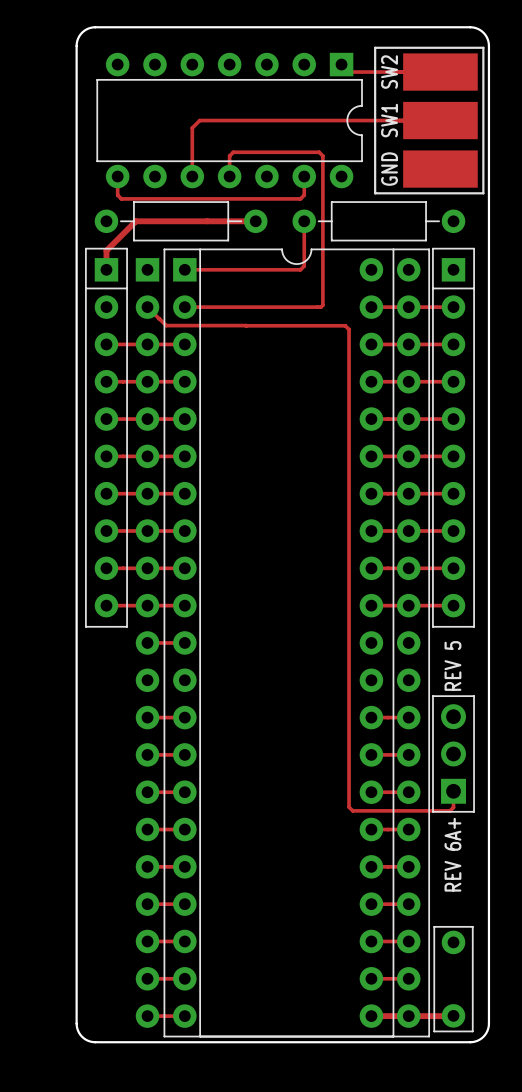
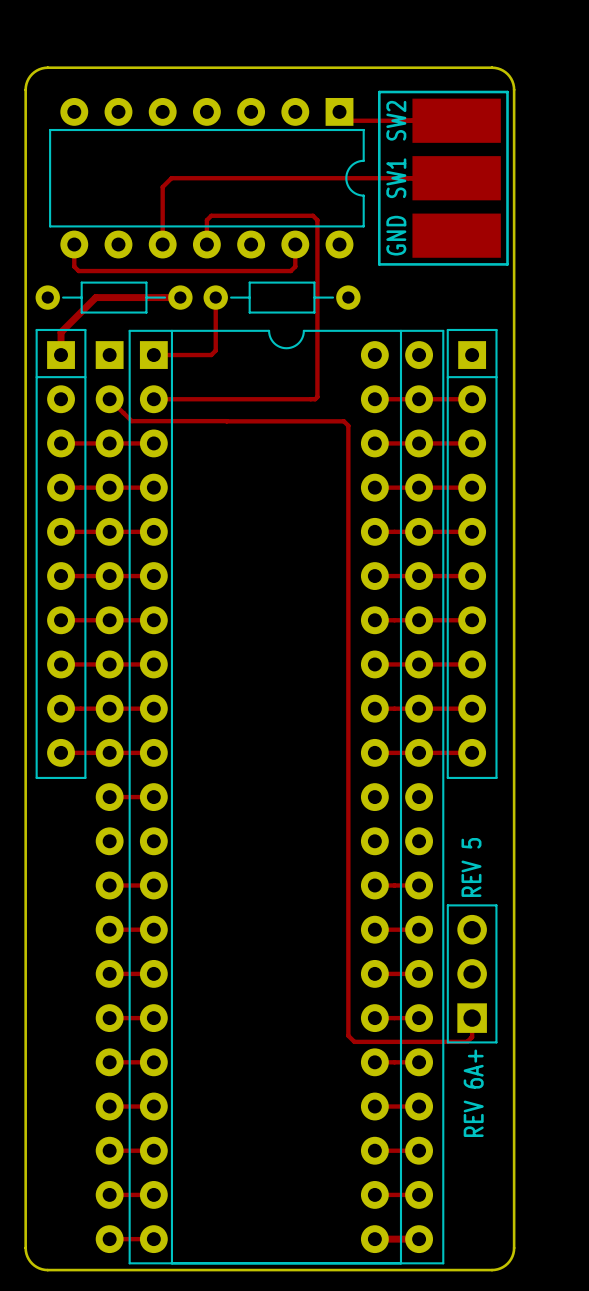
part: none -> (114, 297)
part: (181, 221) -> none
track: (207, 221) (255, 221) -> none
part: none -> (282, 297)
track: (304, 221) (304, 266) (300, 269) (233, 269) -> (215, 297) (215, 350) (211, 355)
part: (378, 221) -> none
text position: REV 5 (452, 666) -> REV 5 (471, 867)
part position: (453, 753) -> (472, 973)
track: (453, 791) (453, 807) (450, 810) (352, 810) (349, 807) -> (472, 1018) (472, 1037) (467, 1041) (354, 1041) (348, 1035) (348, 991)
text position: REV 6A+ (452, 854) -> REV 6A+ (473, 1093)
part: (453, 979) -> none
track: (453, 1015) (408, 1016) -> none

